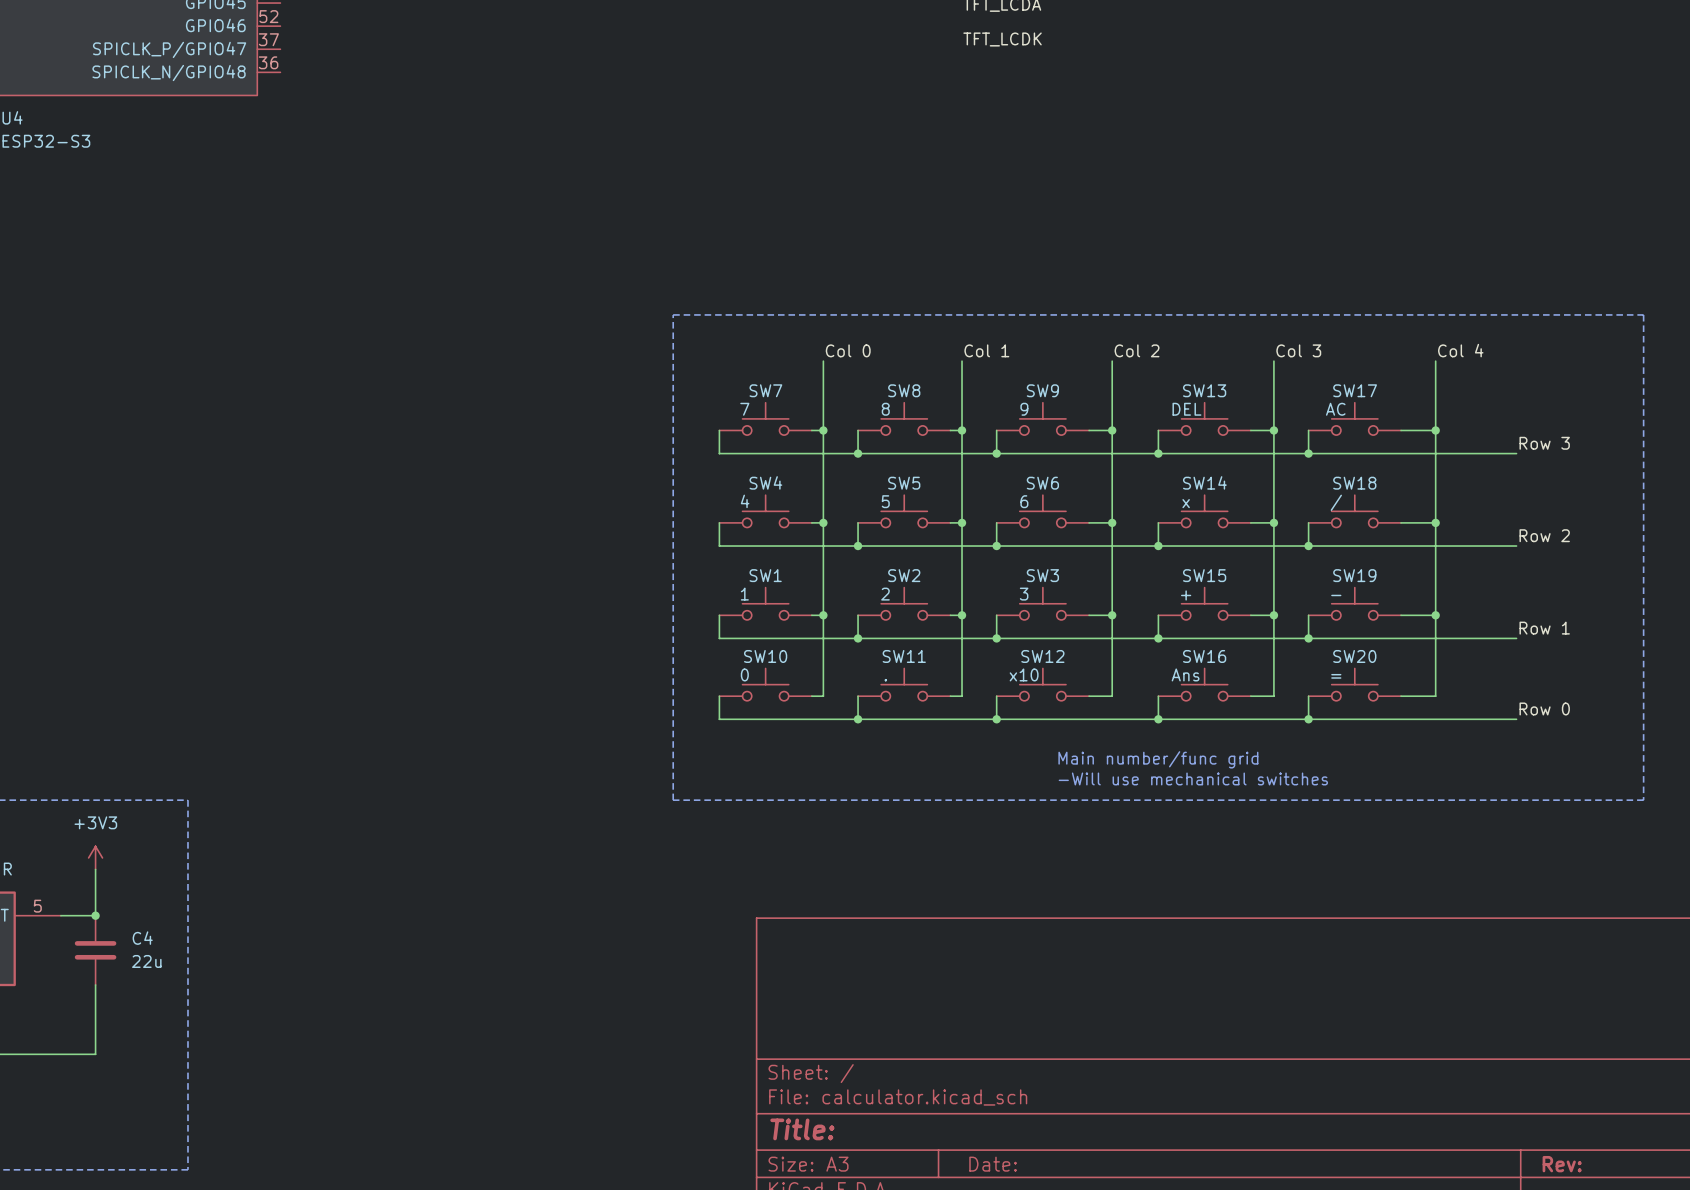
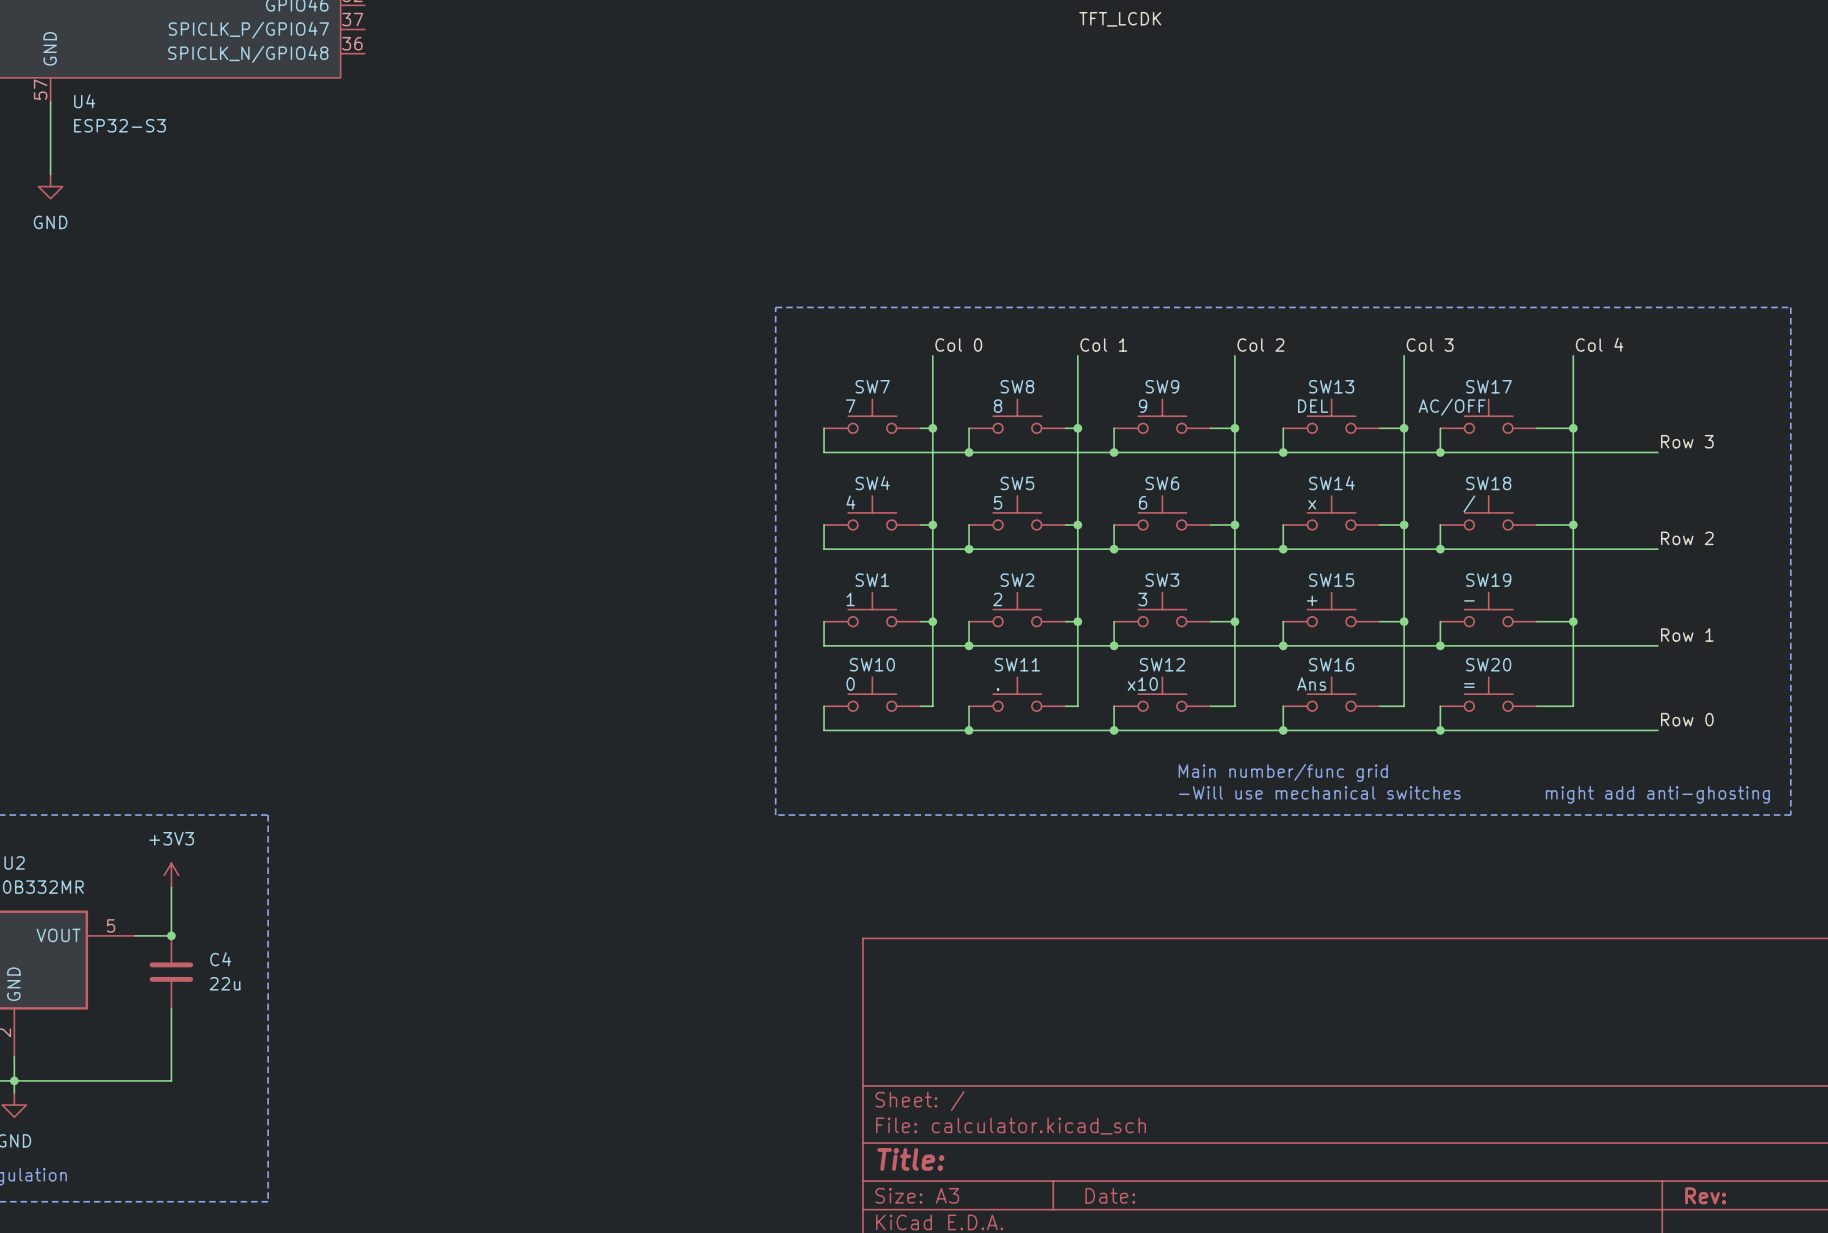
SW17 value: AC (1335, 409) -> AC/OFF (1452, 407)
text: none -> might add anti-ghosting (1657, 794)

